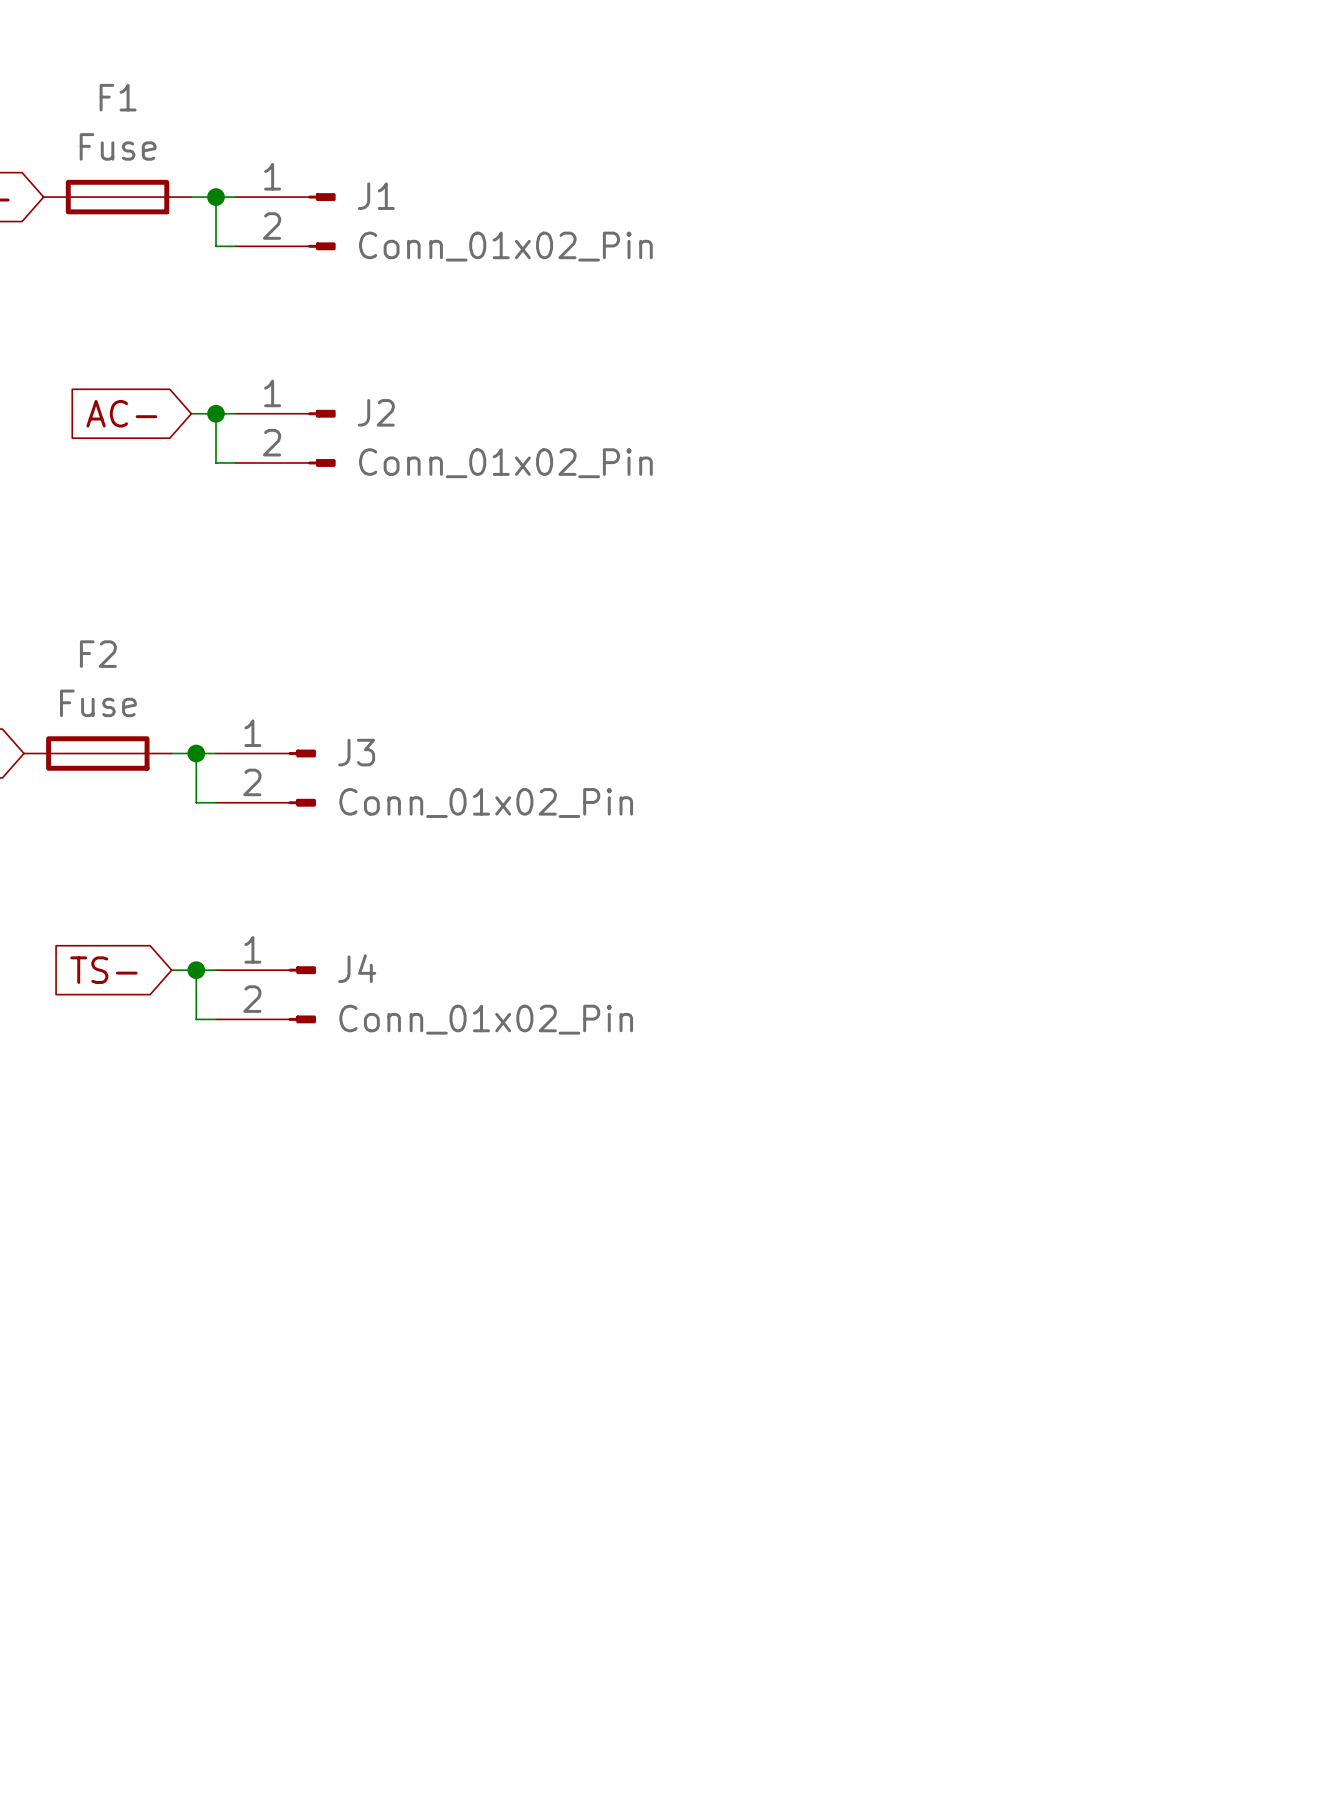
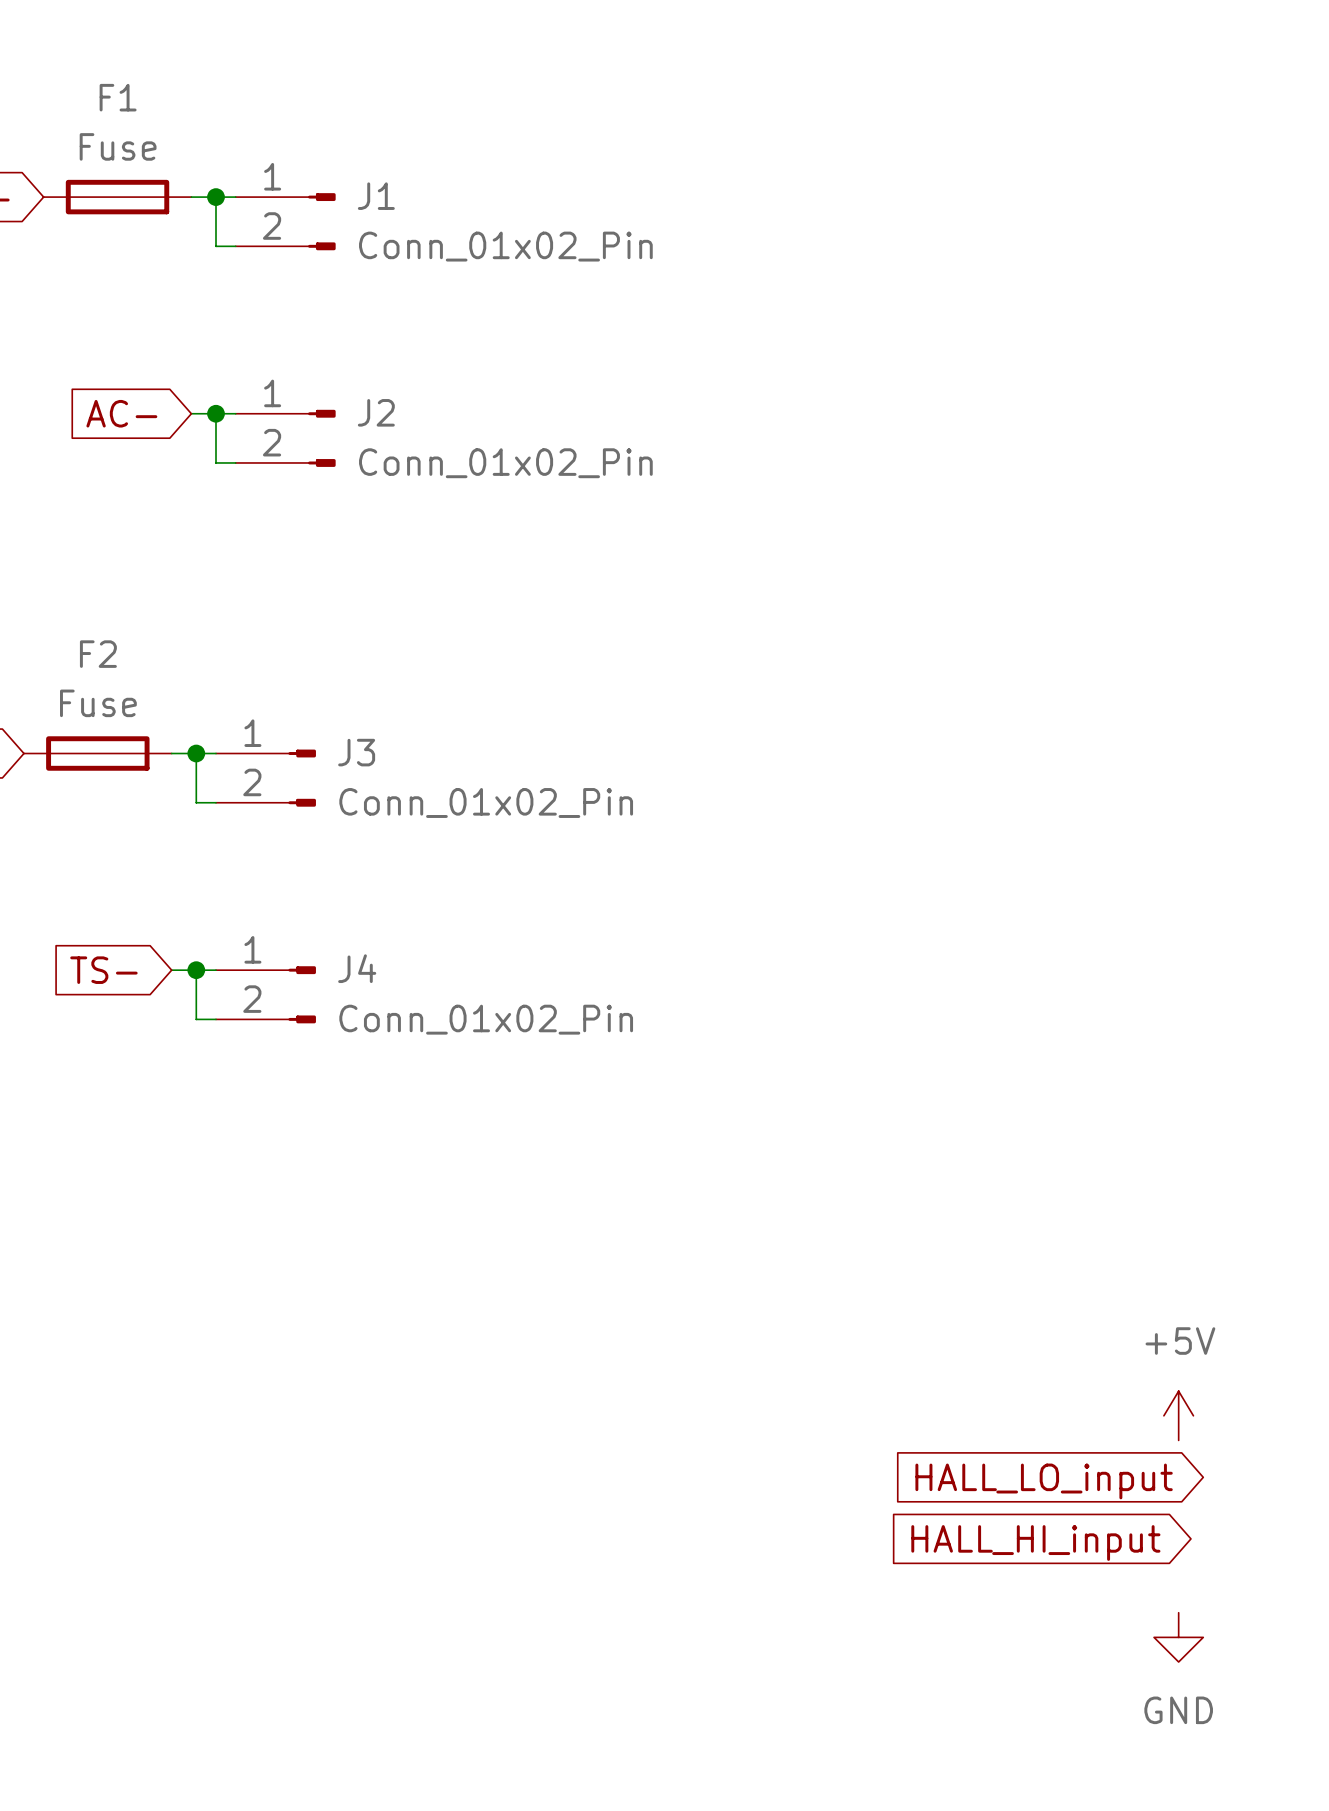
power symbol: none -> +5V (1178, 1415)
global label: none -> HALL_LO_input (1044, 1481)
global label: none -> HALL_HI_input (1035, 1543)
power symbol: none -> GND (1178, 1637)

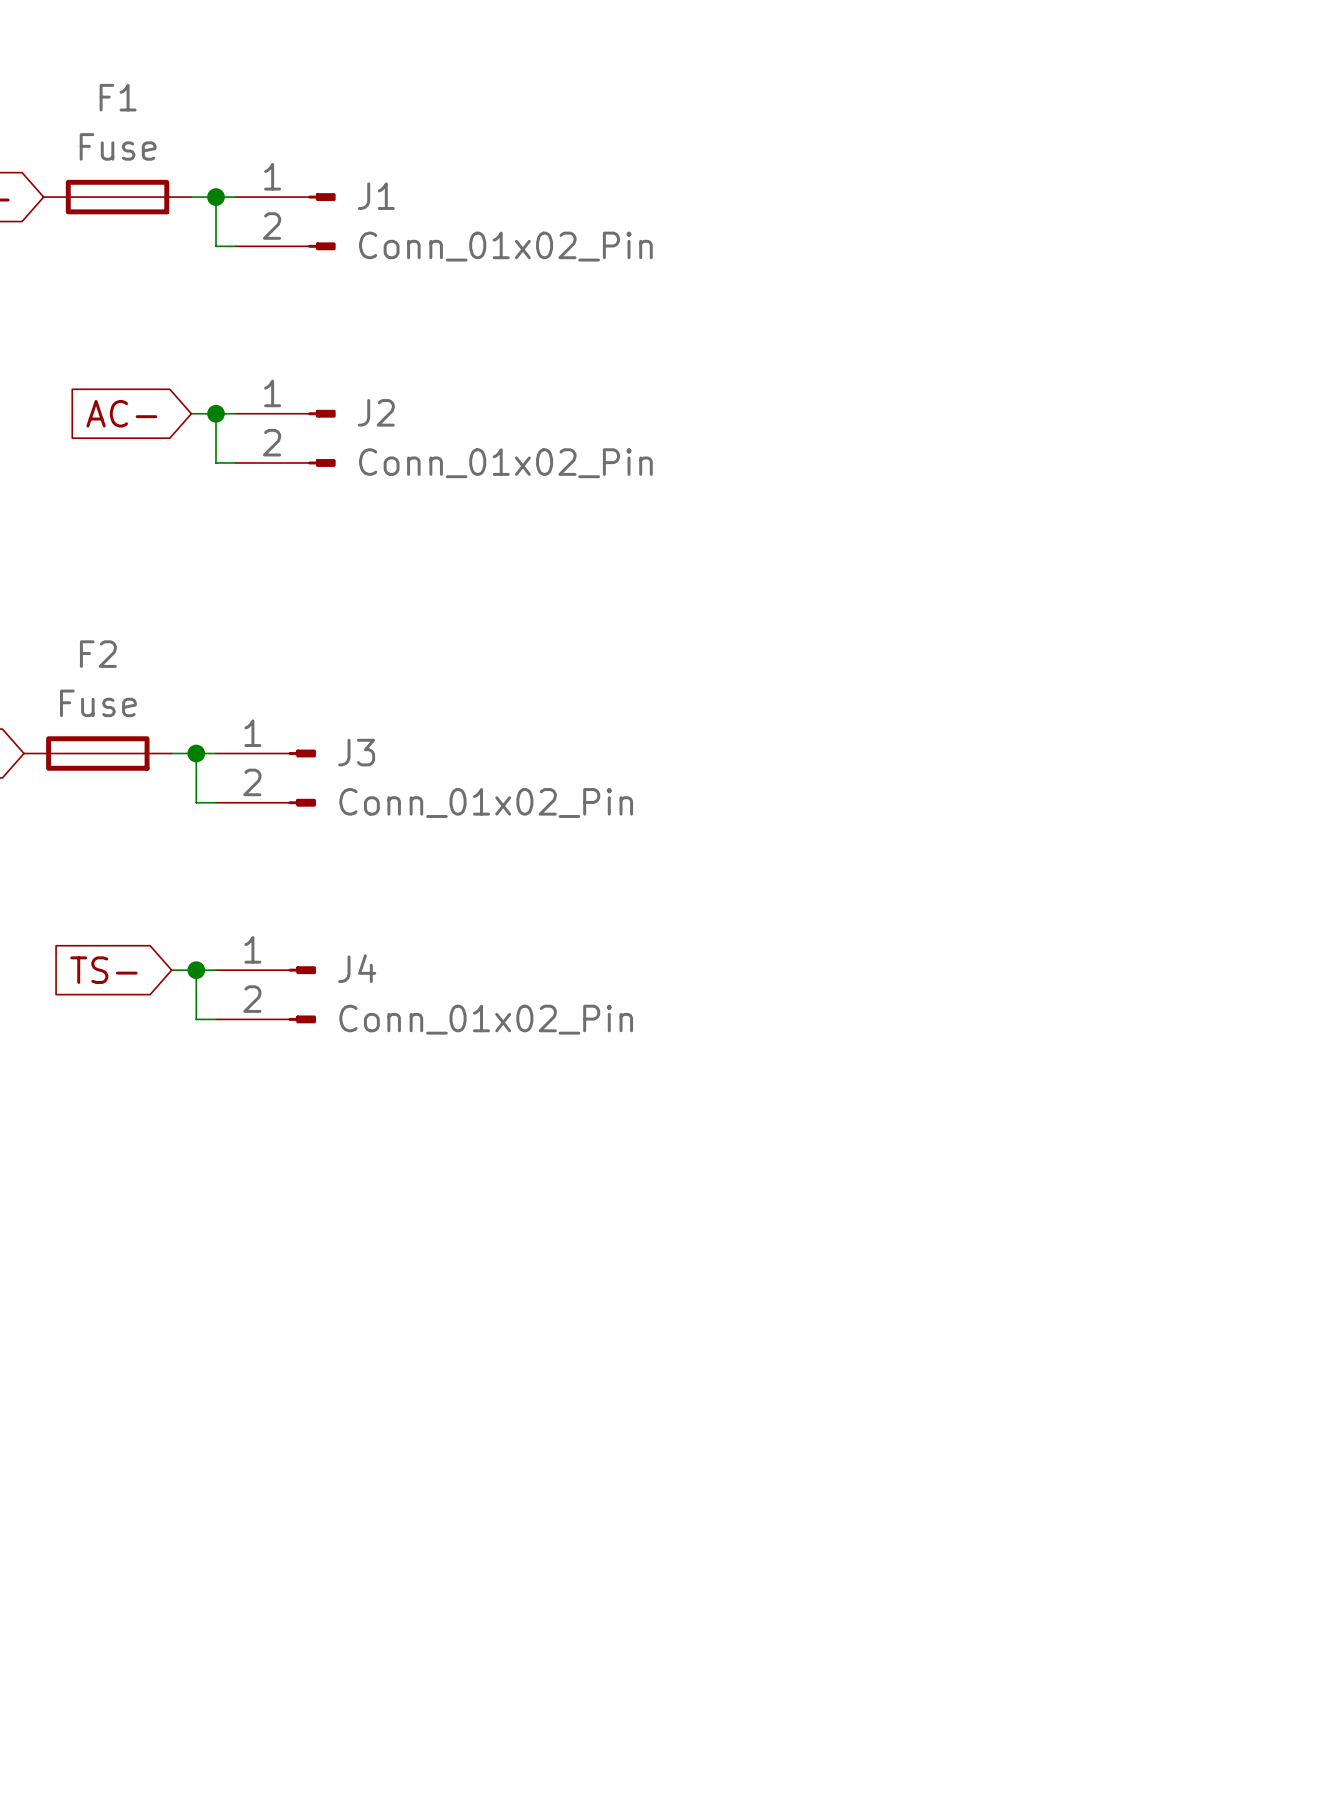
power symbol: +5V (1178, 1415) -> none
global label: HALL_LO_input (1044, 1481) -> none
global label: HALL_HI_input (1035, 1543) -> none
power symbol: GND (1178, 1637) -> none

